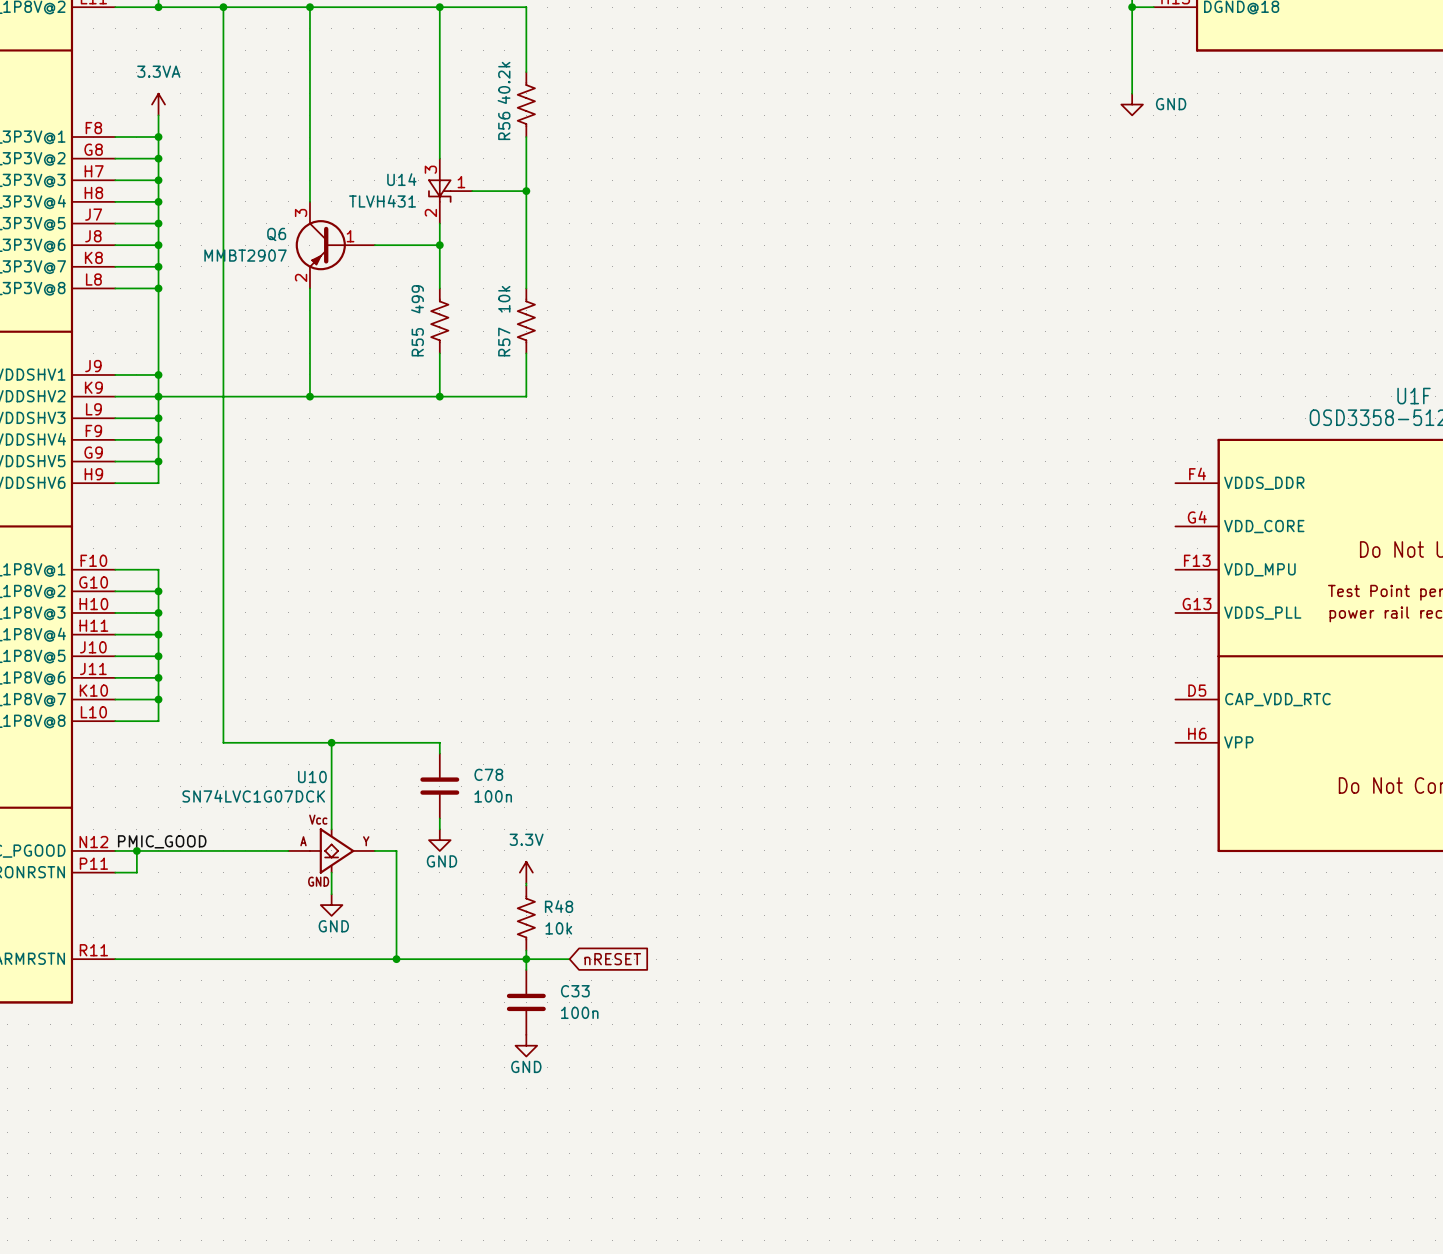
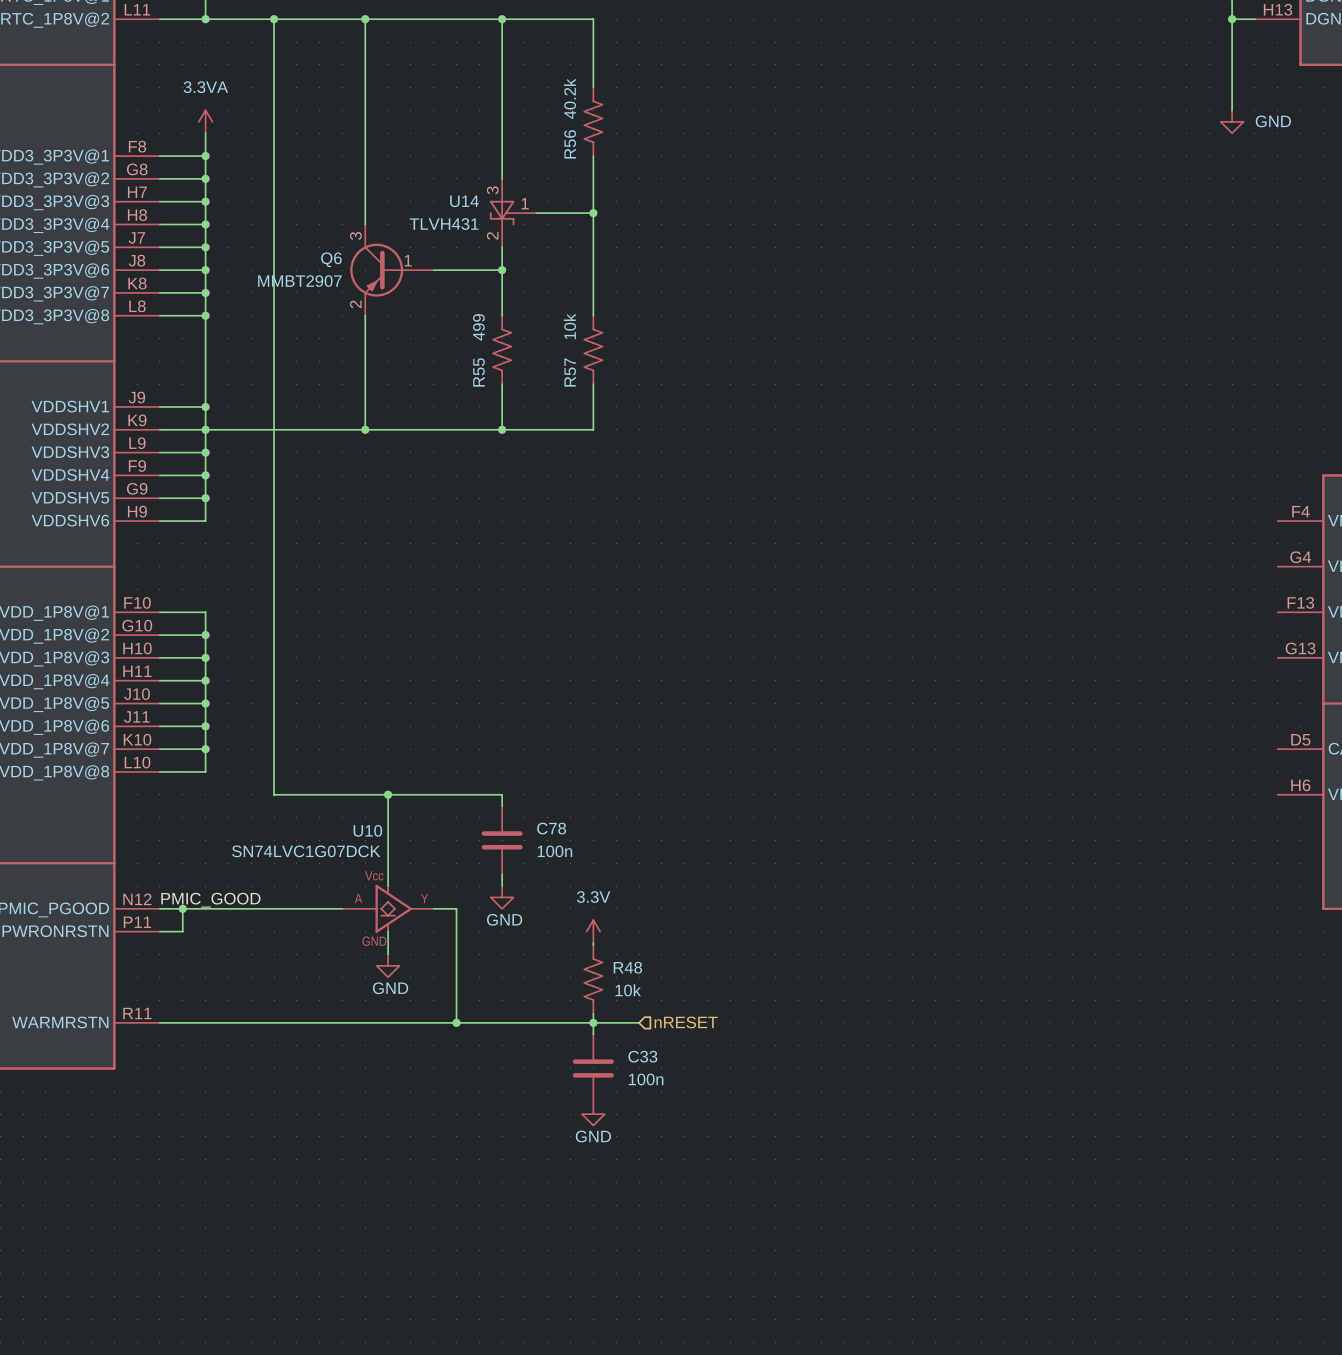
hierarchical label: none -> nRESET (686, 1022)
global label: nRESET (612, 959) -> none

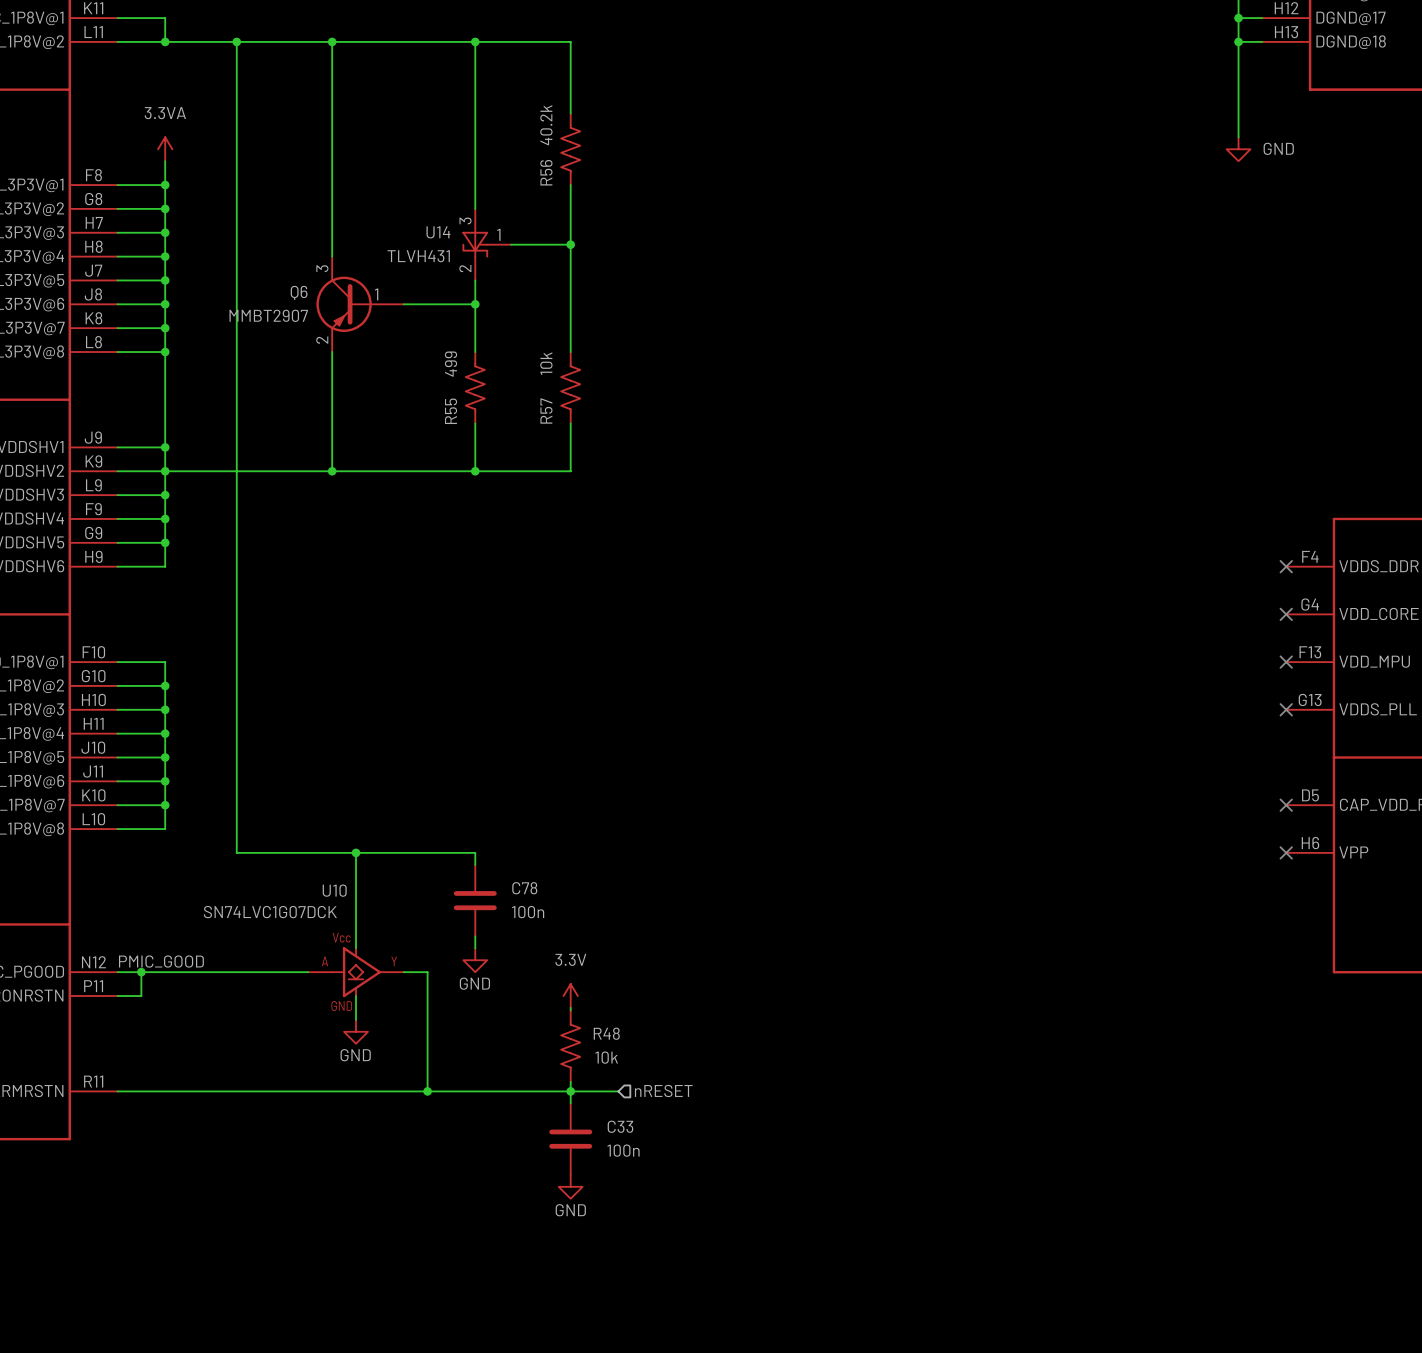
no-connect mark: none -> (1286, 566)
no-connect mark: none -> (1286, 614)
no-connect mark: none -> (1286, 662)
no-connect mark: none -> (1286, 709)
no-connect mark: none -> (1286, 805)
no-connect mark: none -> (1286, 852)

